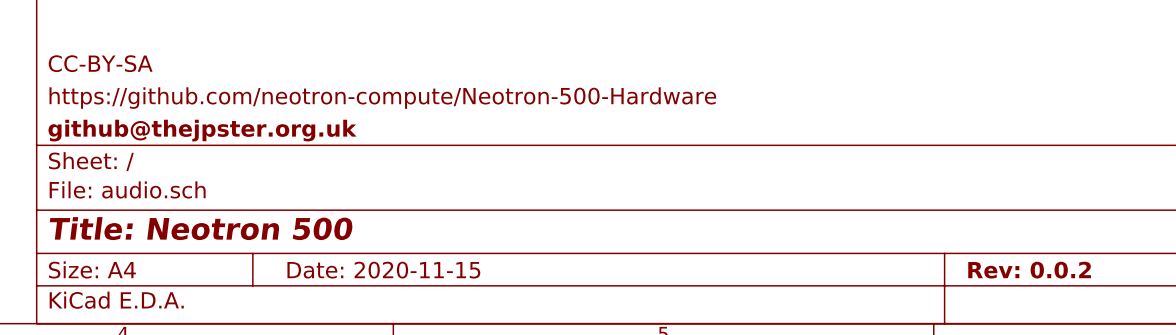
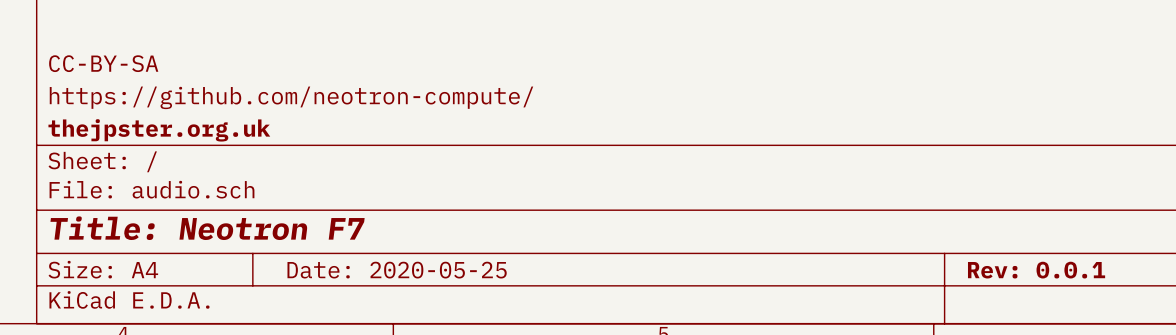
title block: https://github.com/neotron-compute/Neotron-500-Hardware (382, 98) -> https://github.com/neotron-compute/ (291, 97)
title block: github@thejpster.org.uk (202, 130) -> thejpster.org.uk (159, 130)
title block: Title: Neotron 500 (201, 228) -> Title: Neotron F7 (207, 228)
title block: Date: 2020-11-15 (383, 270) -> Date: 2020-05-25 (397, 270)
title block: Rev: 0.0.2 (1029, 270) -> Rev: 0.0.1 (1036, 270)

